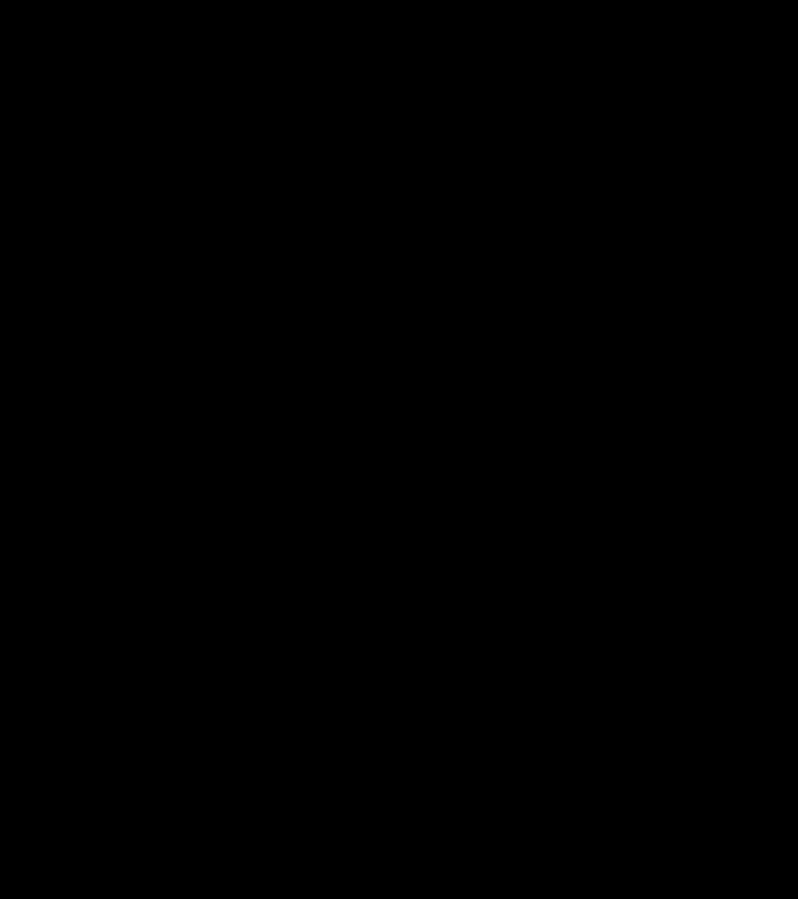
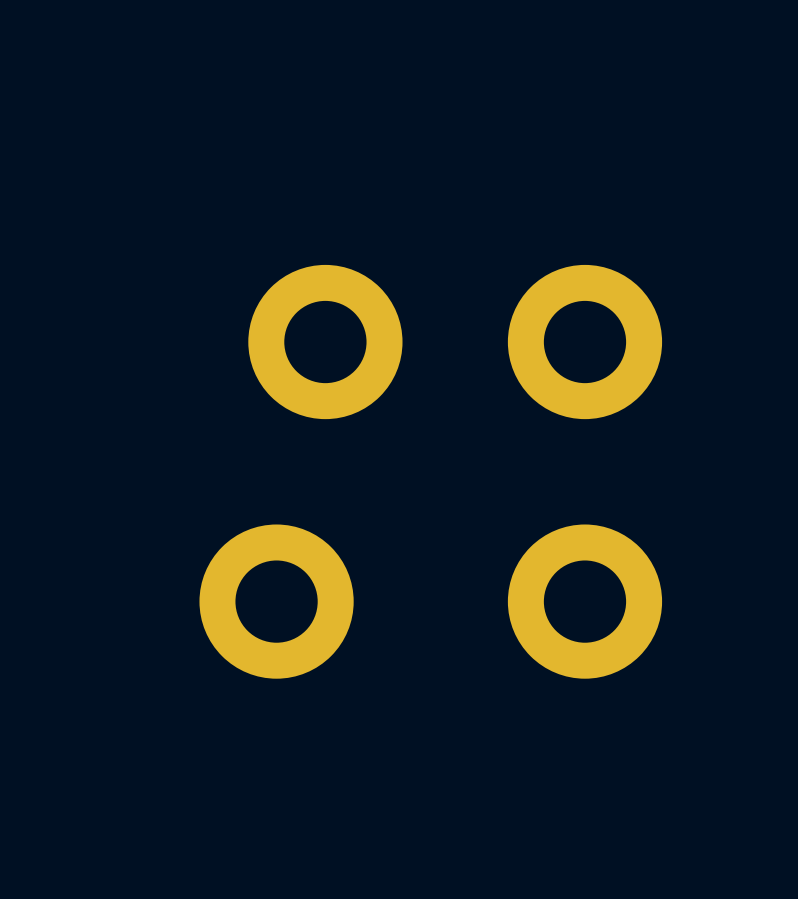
part: none -> (325, 342)
part: none -> (584, 342)
part: none -> (276, 601)
part: none -> (584, 601)

